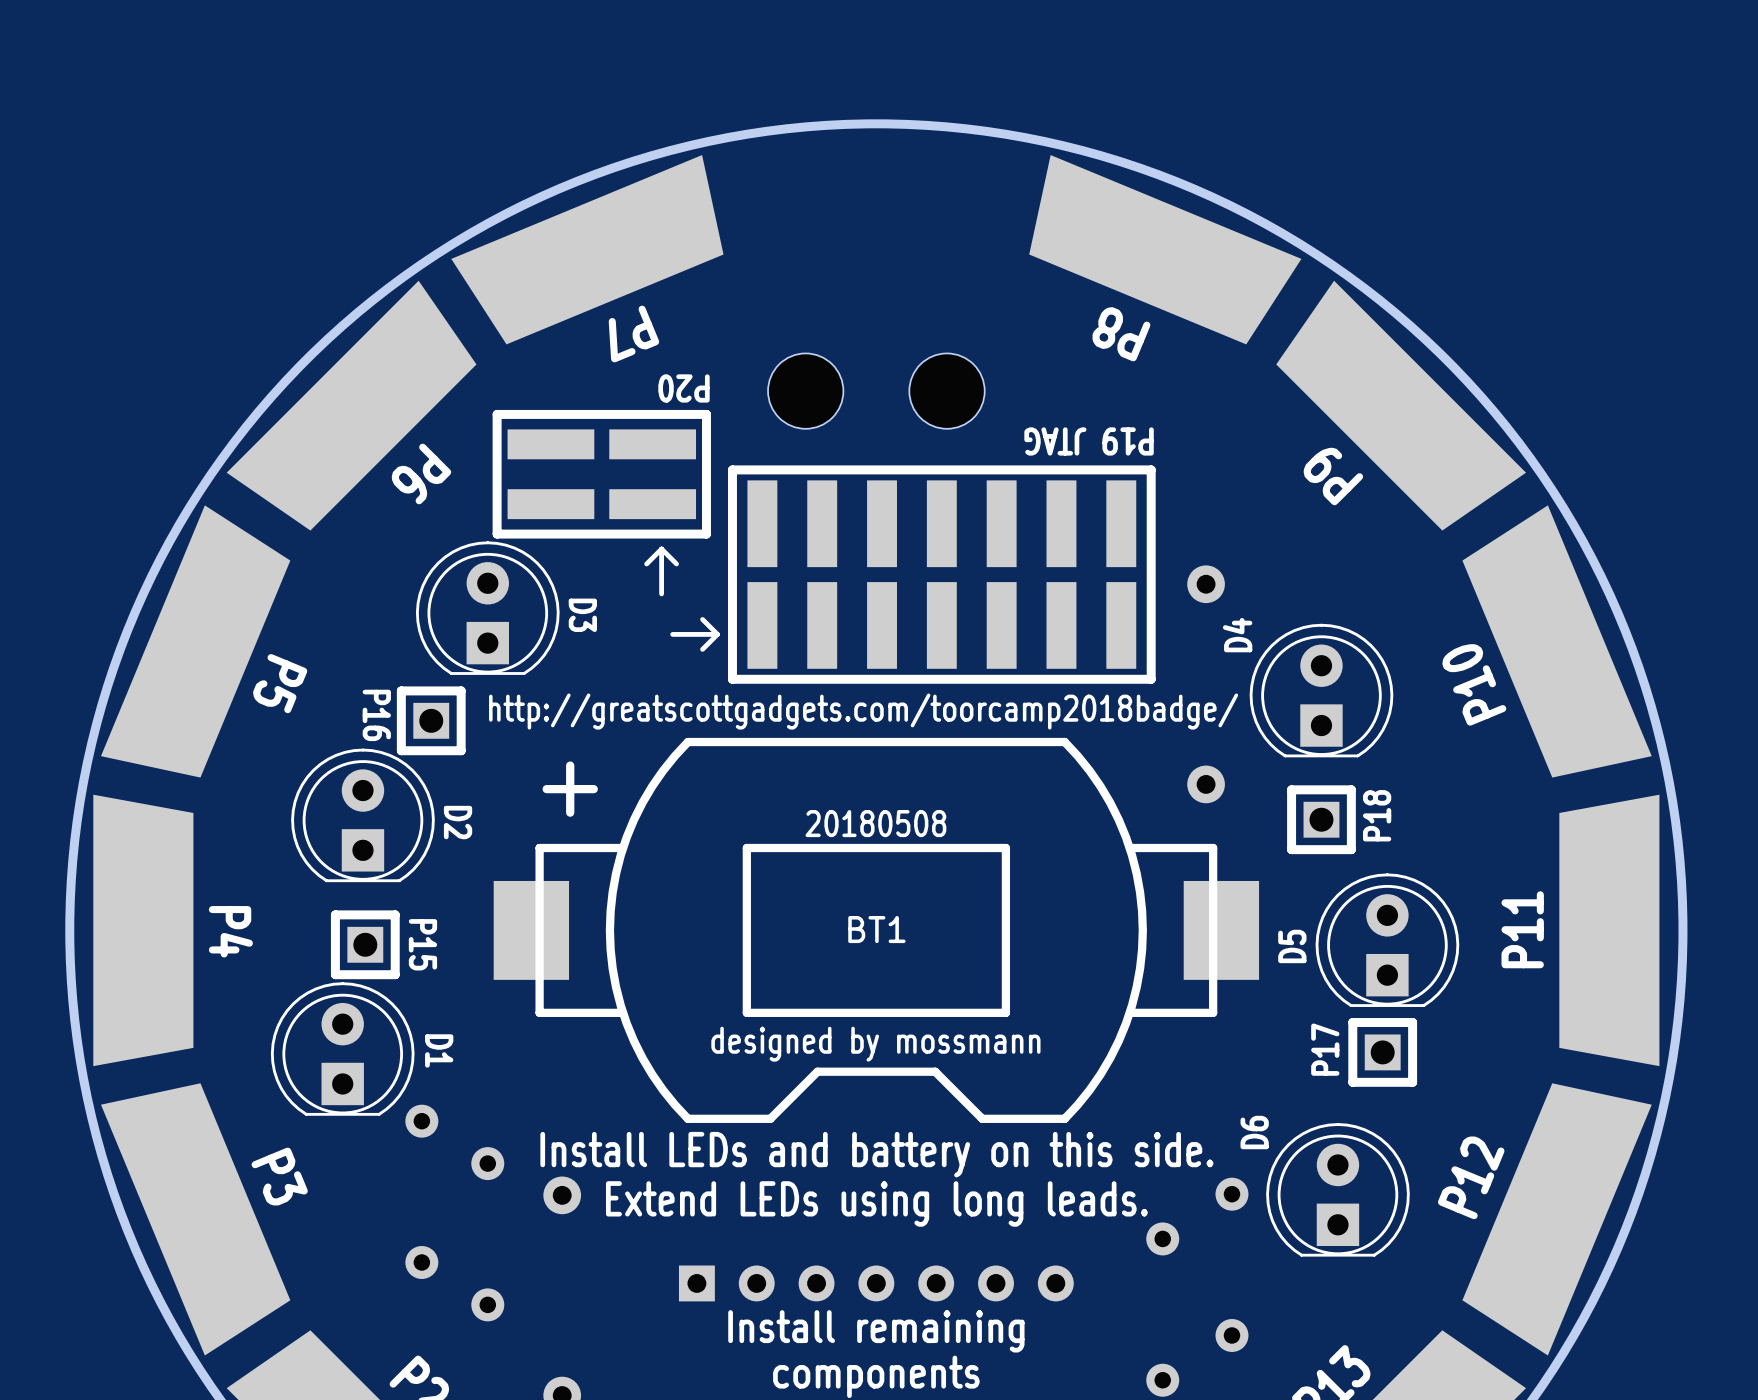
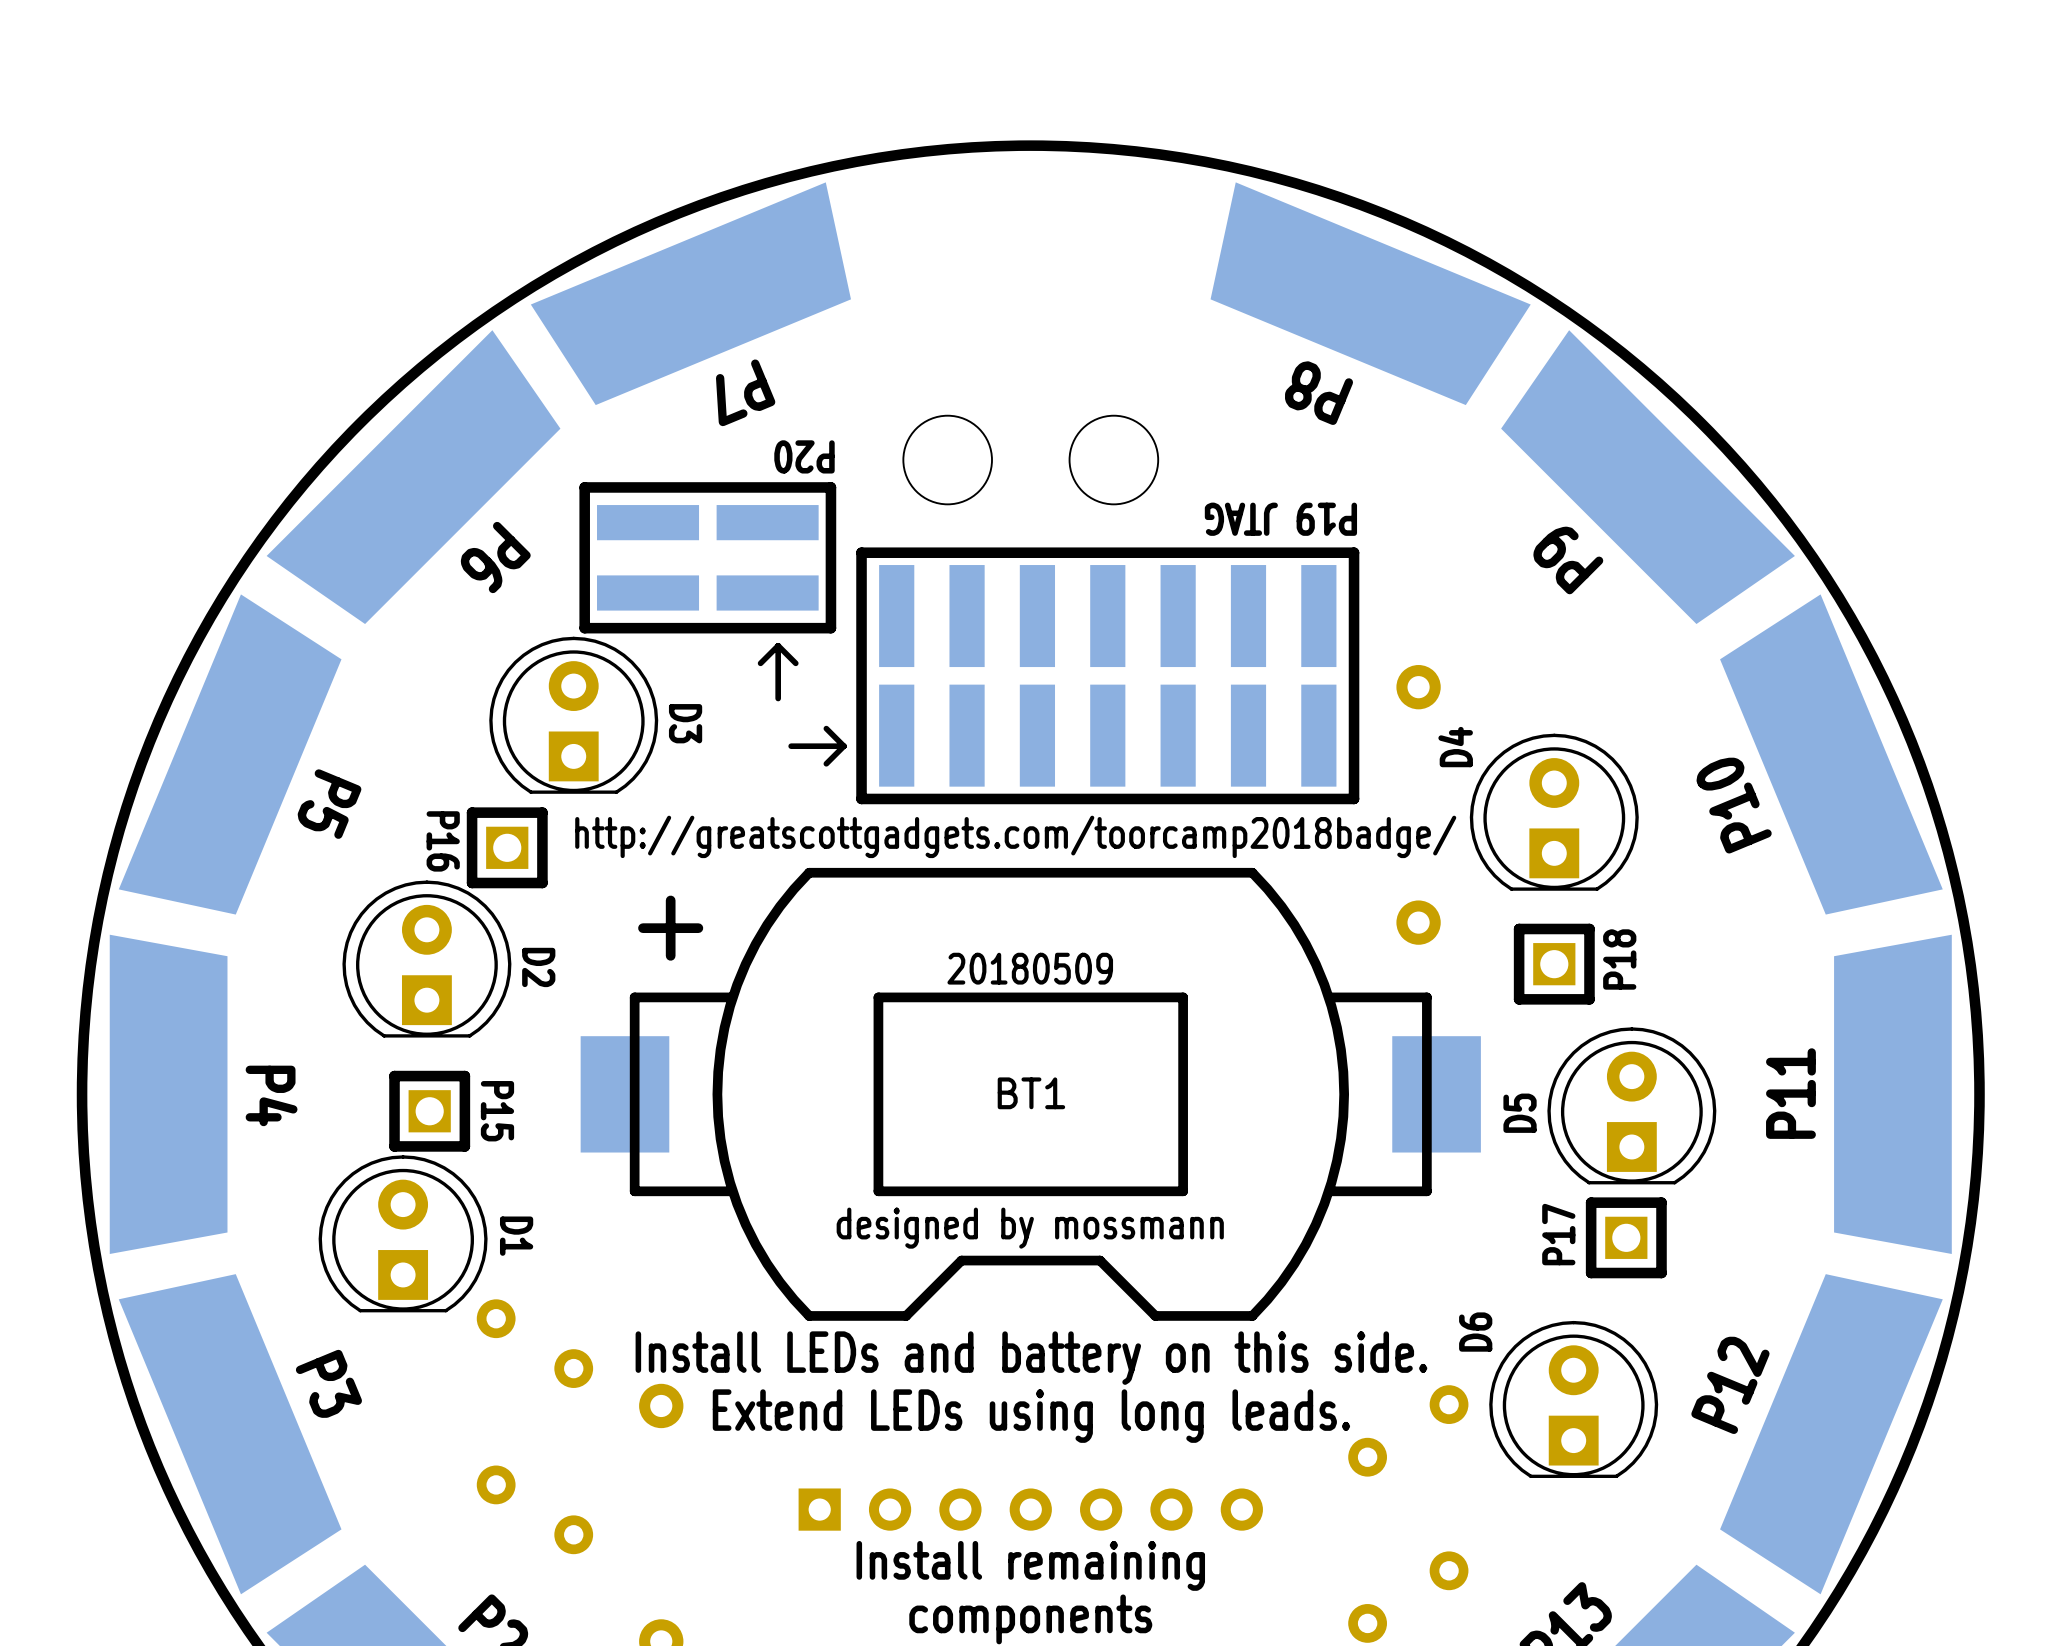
text: 20180508 (875, 823) -> 20180509 (1030, 968)

